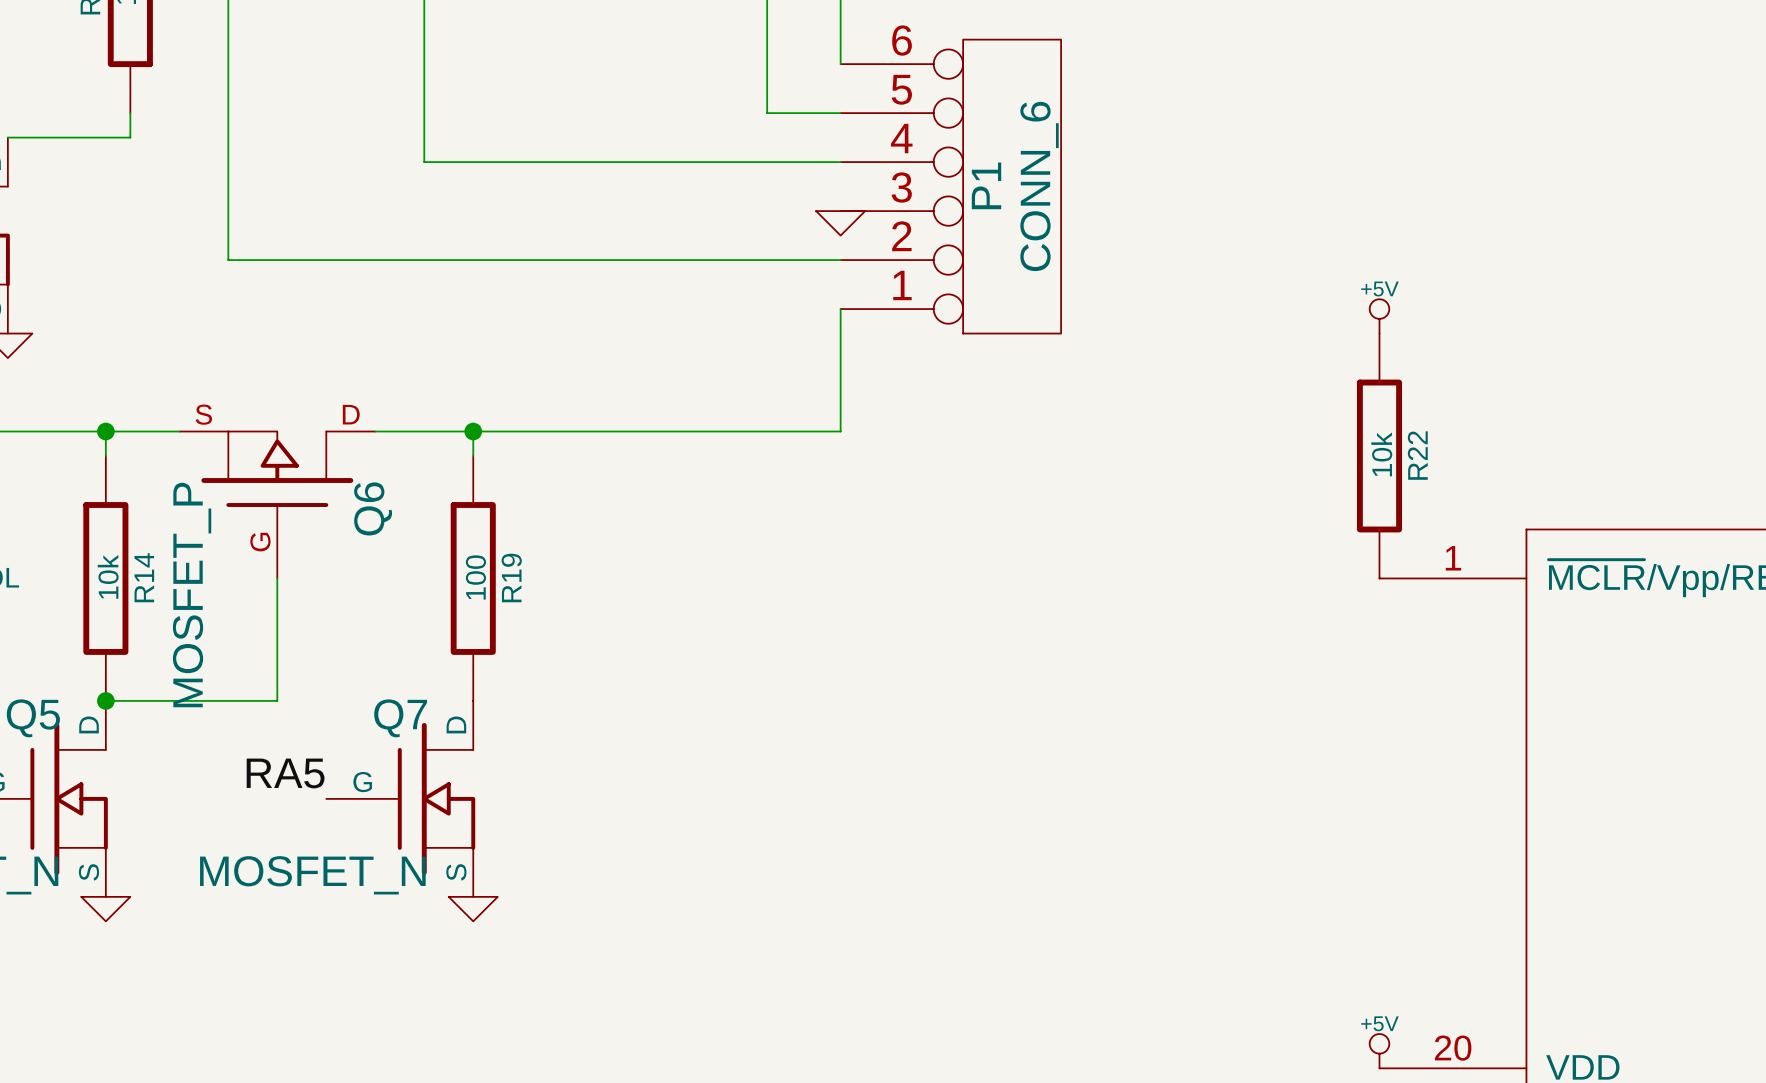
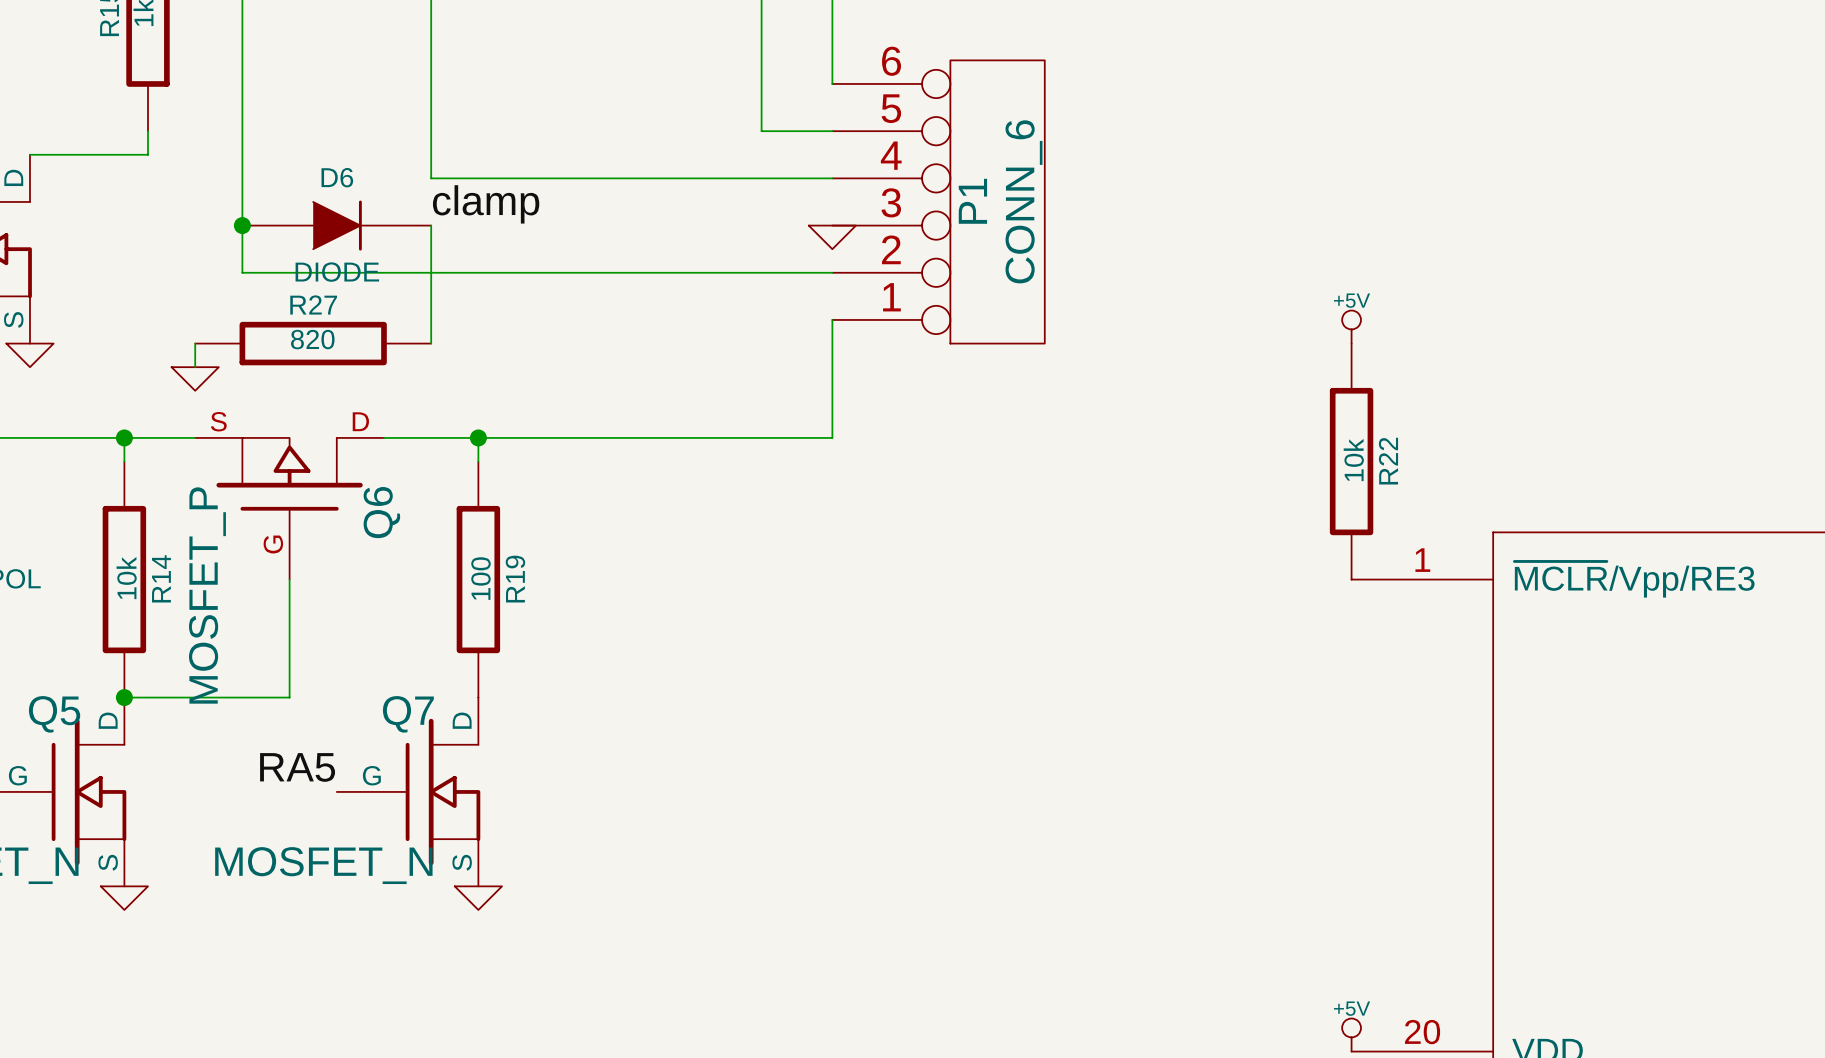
label: none -> clamp (486, 204)
junction: none -> (242, 225)
D6: none -> DIODE (336, 225)
wire: none -> (431, 225) (431, 343)
wire: none -> (195, 343) (195, 367)
R27: none -> 820 (313, 343)
power symbol: none -> (195, 378)

